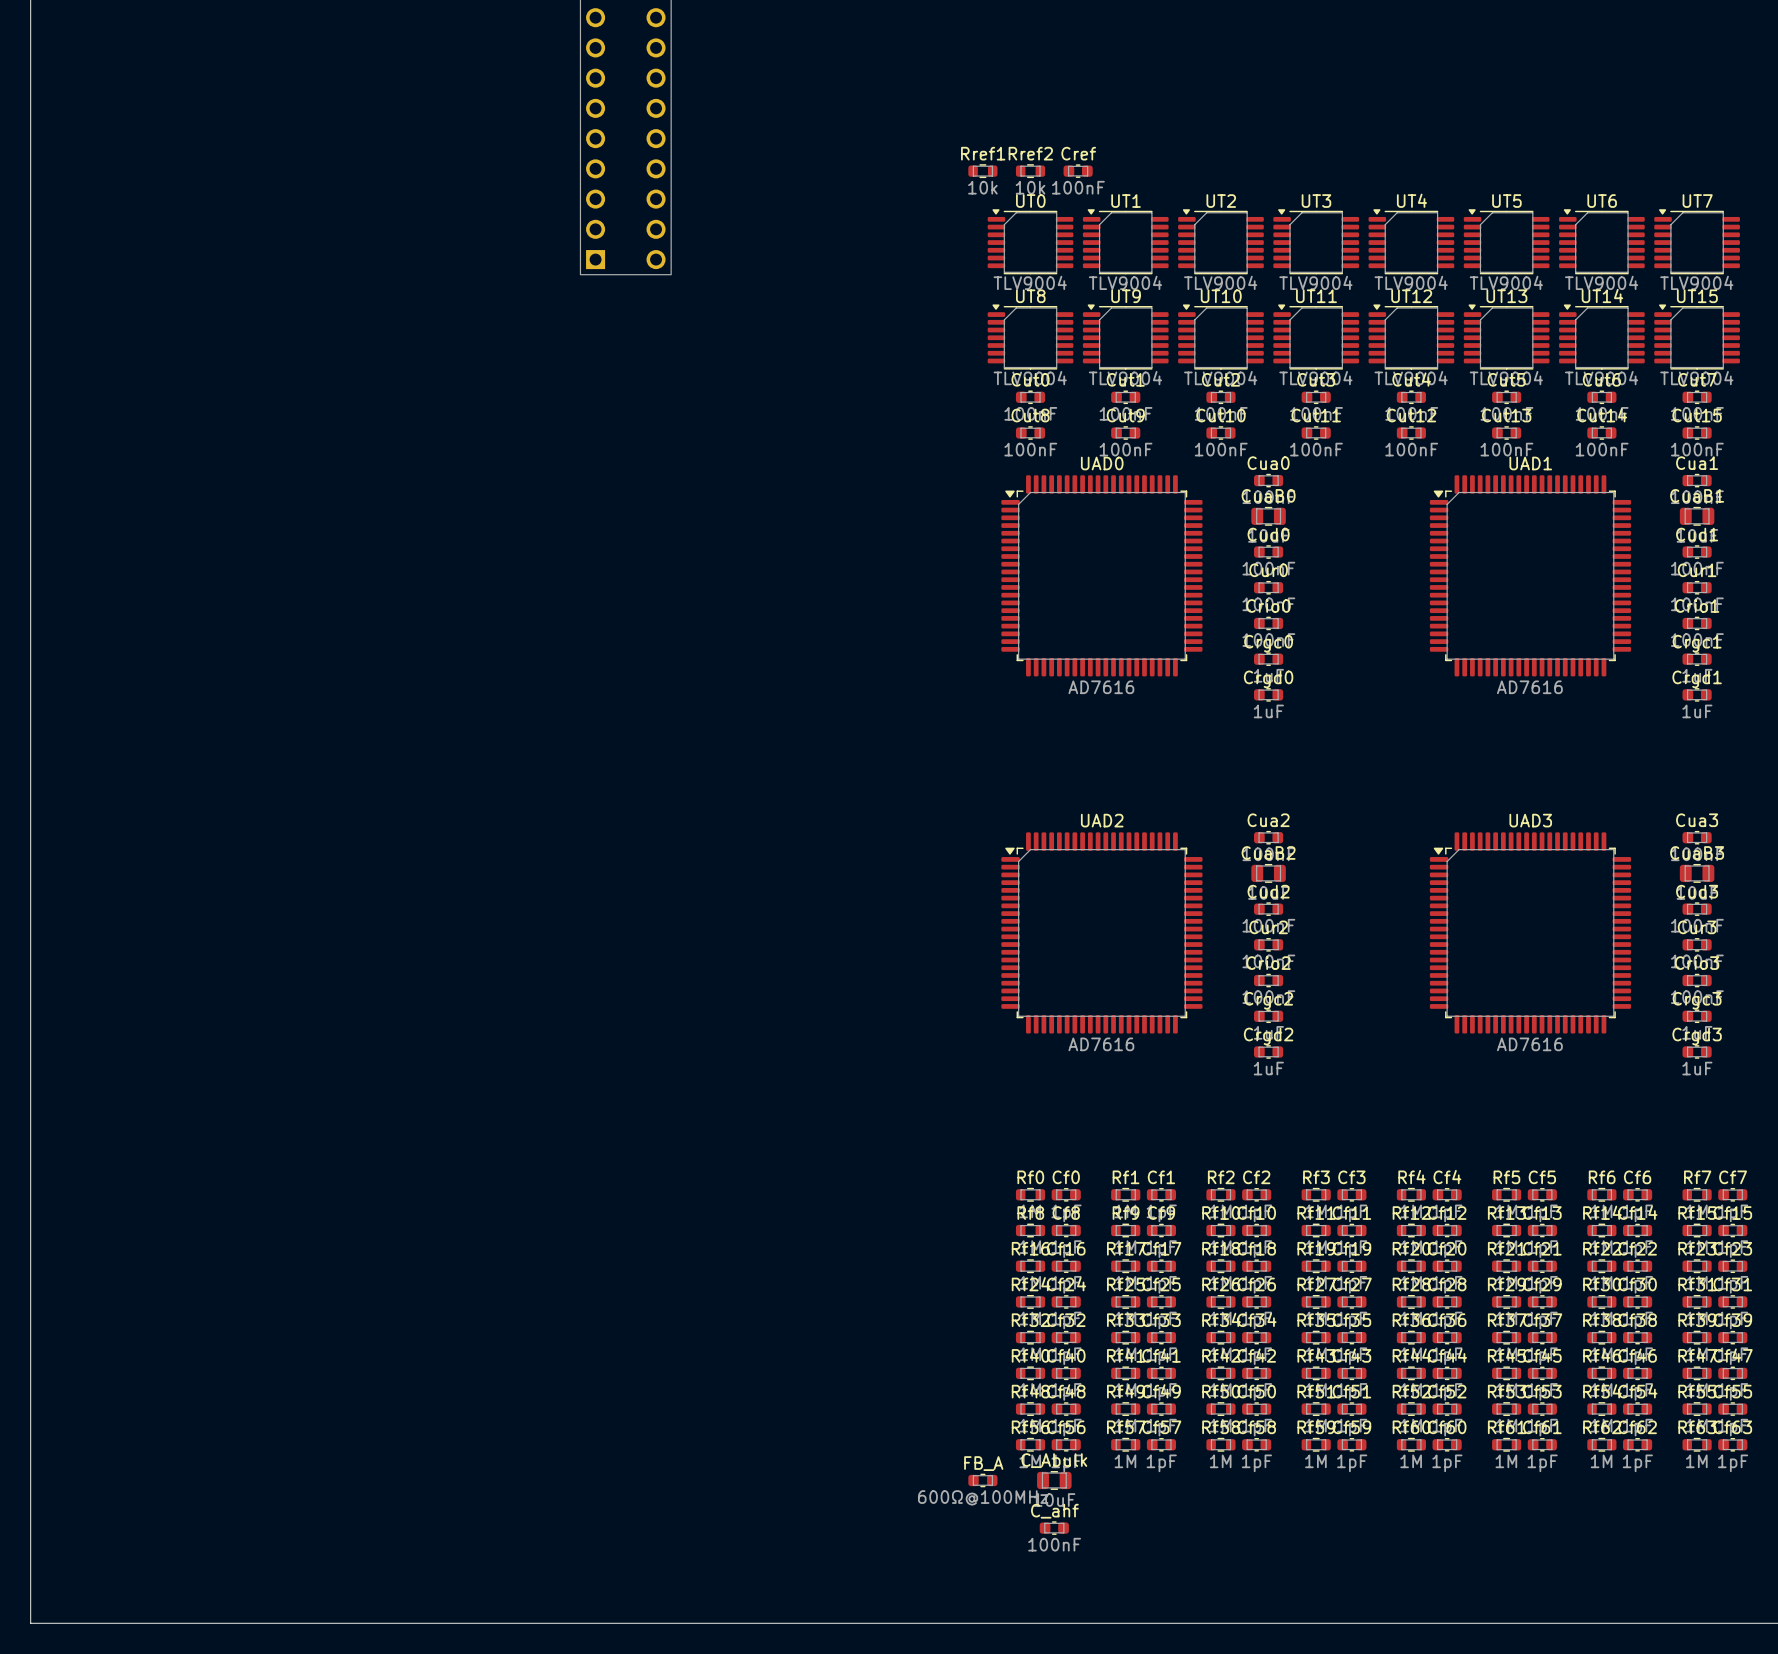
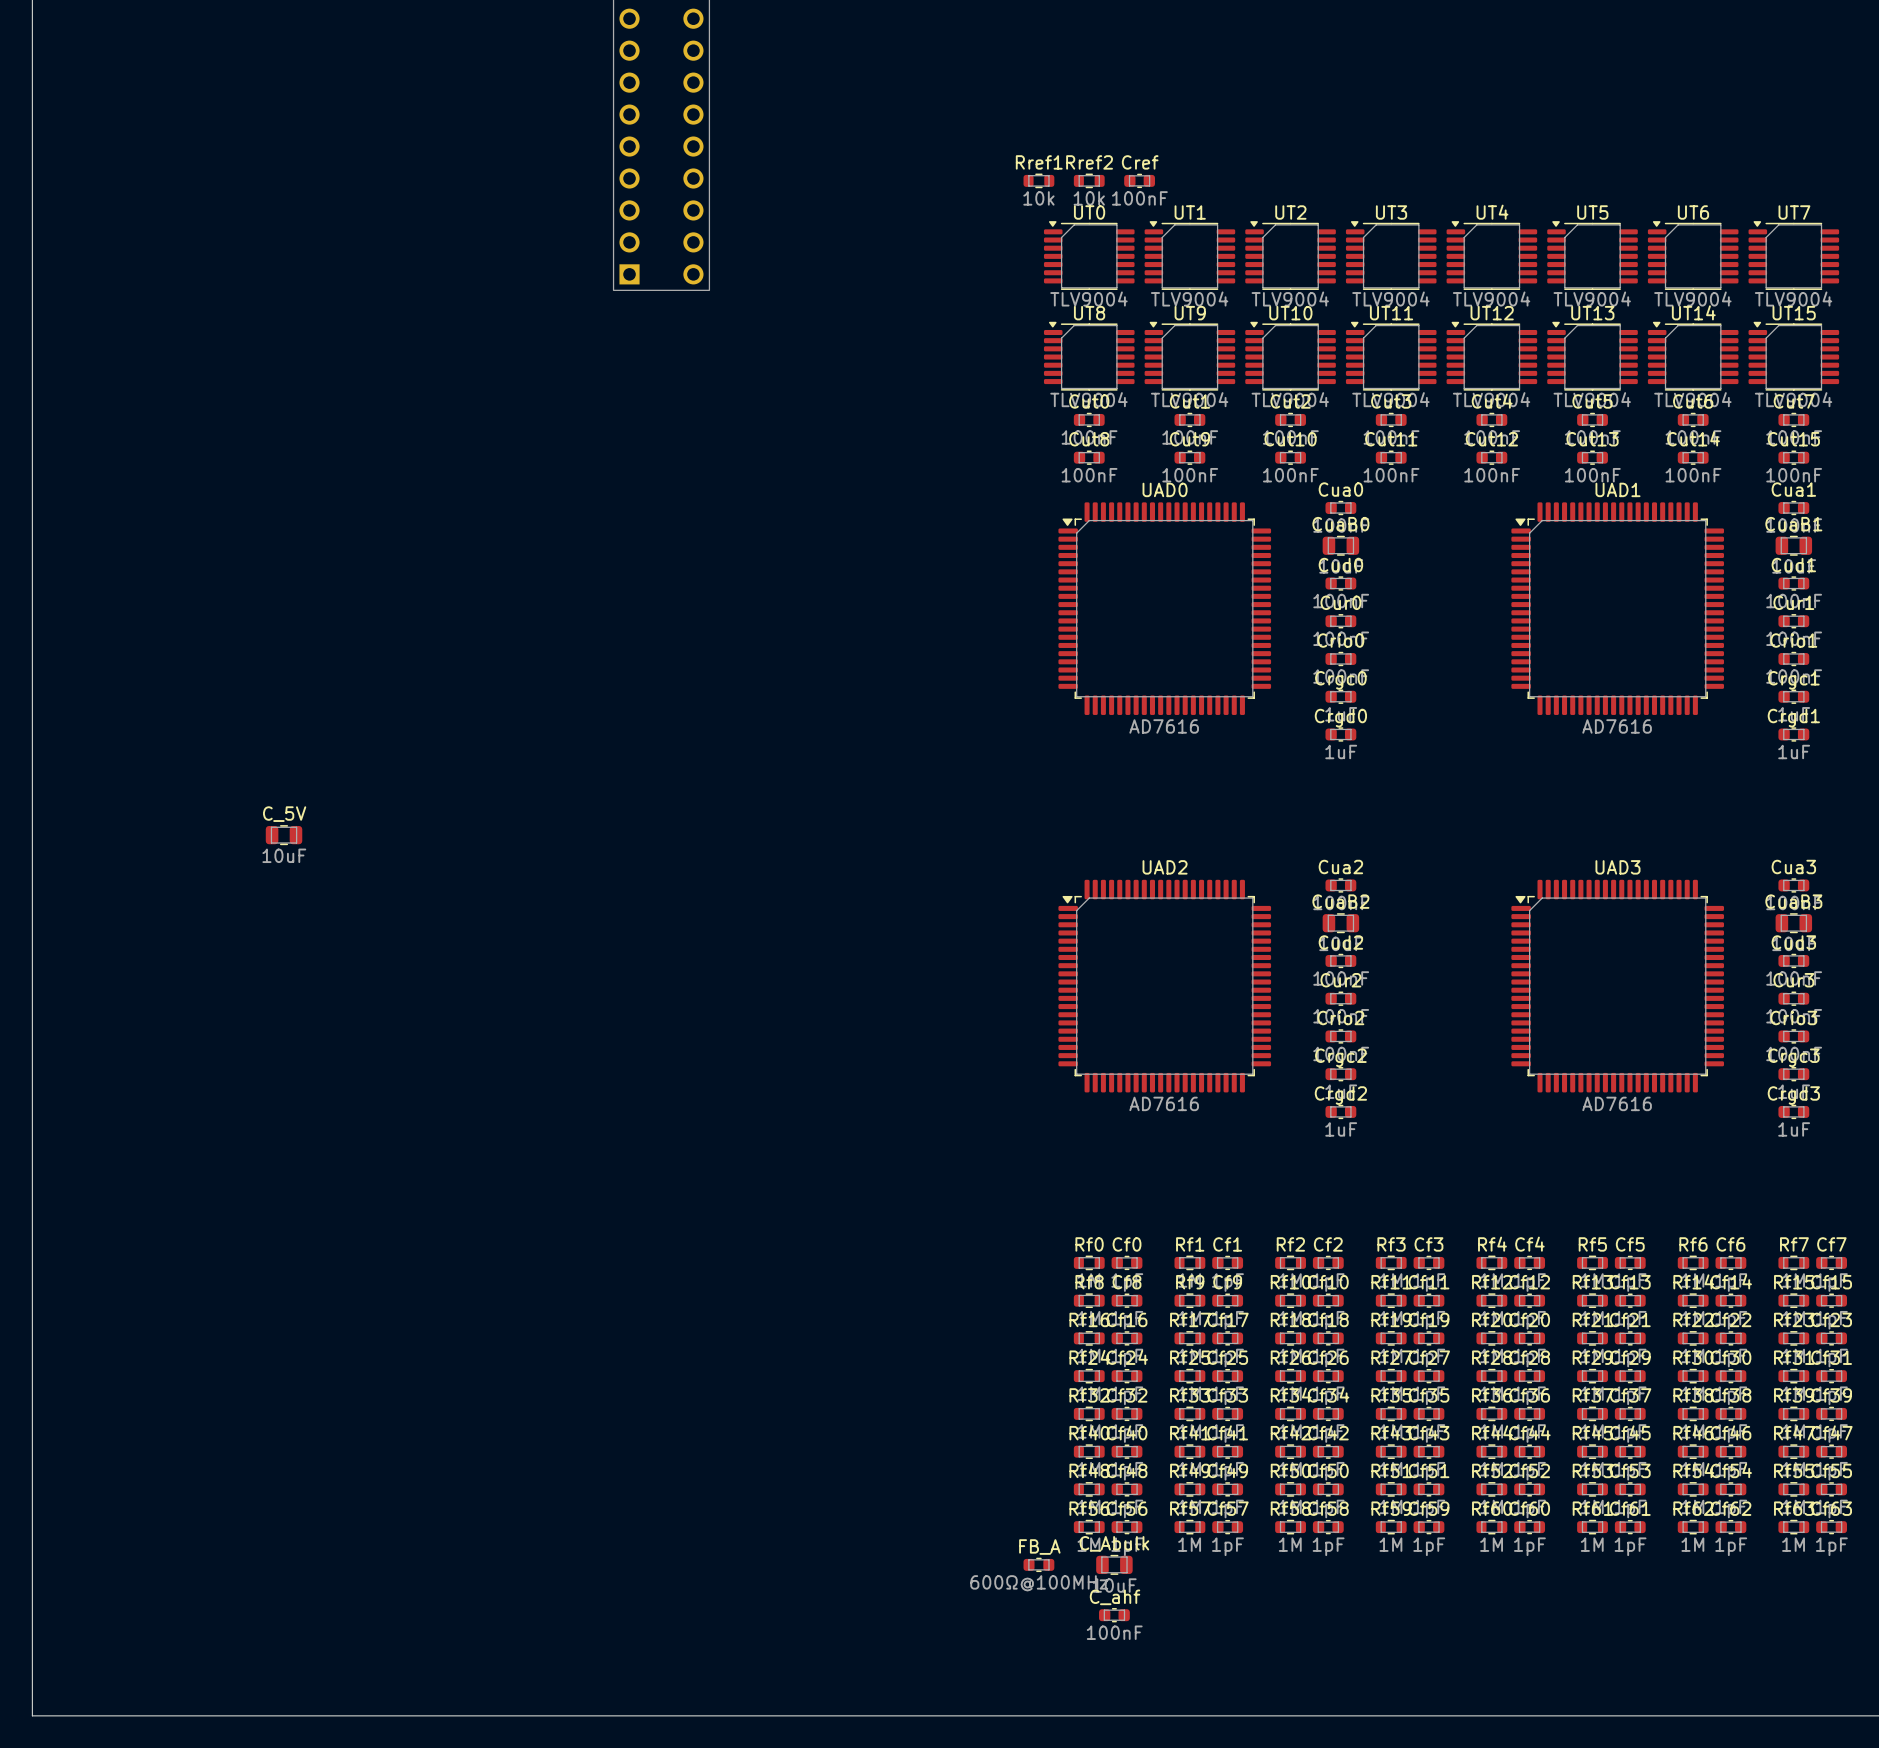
C_5V: none -> 10uF (284, 835)

